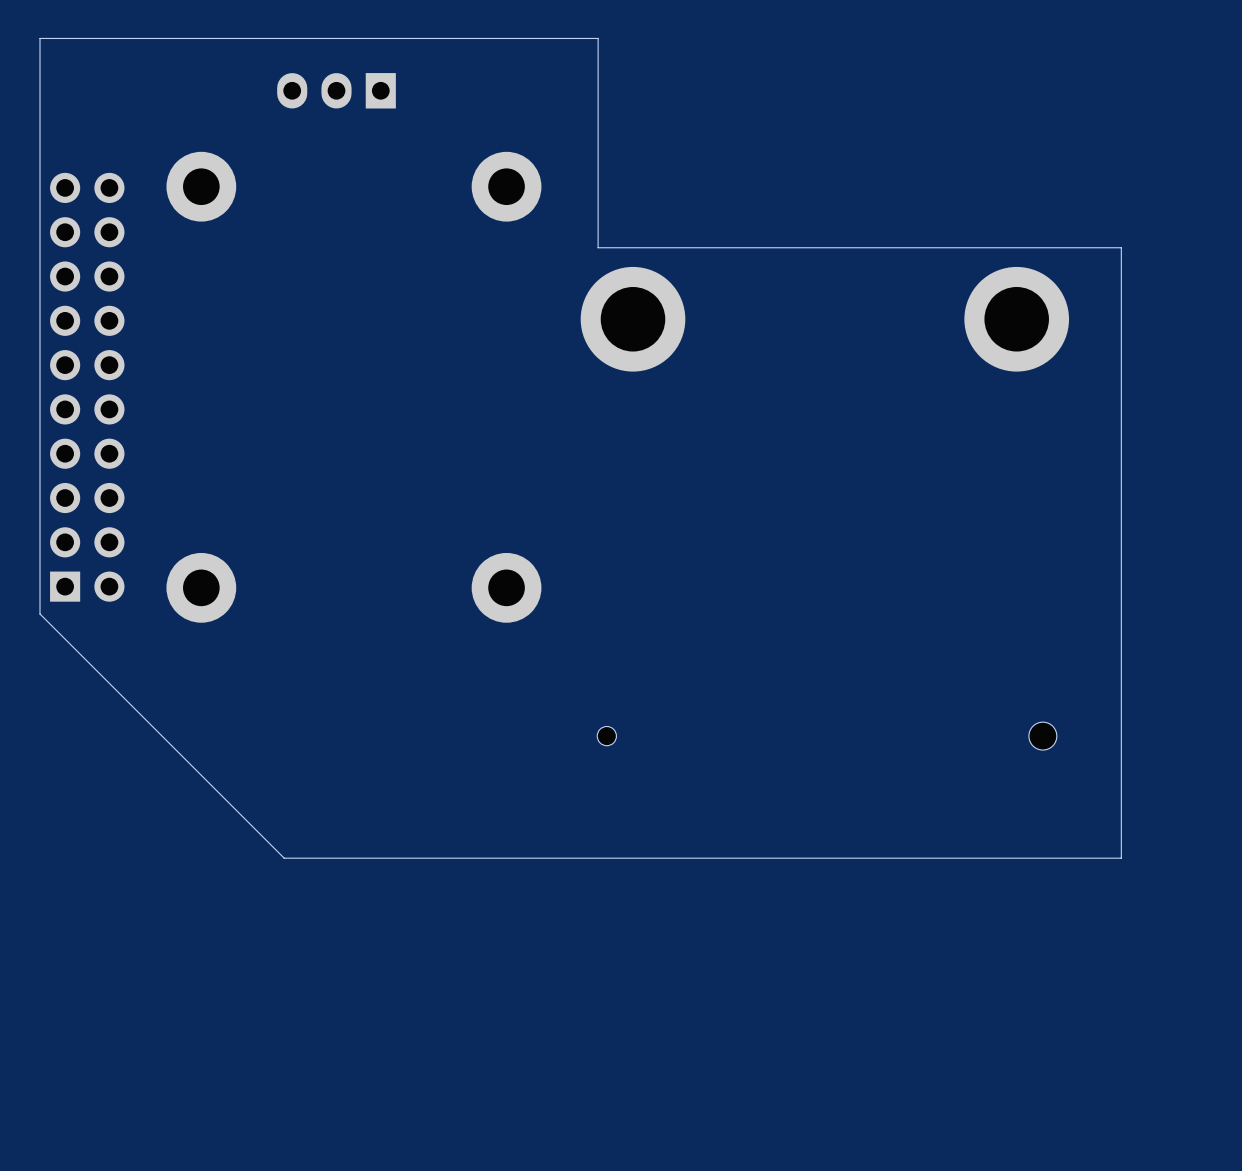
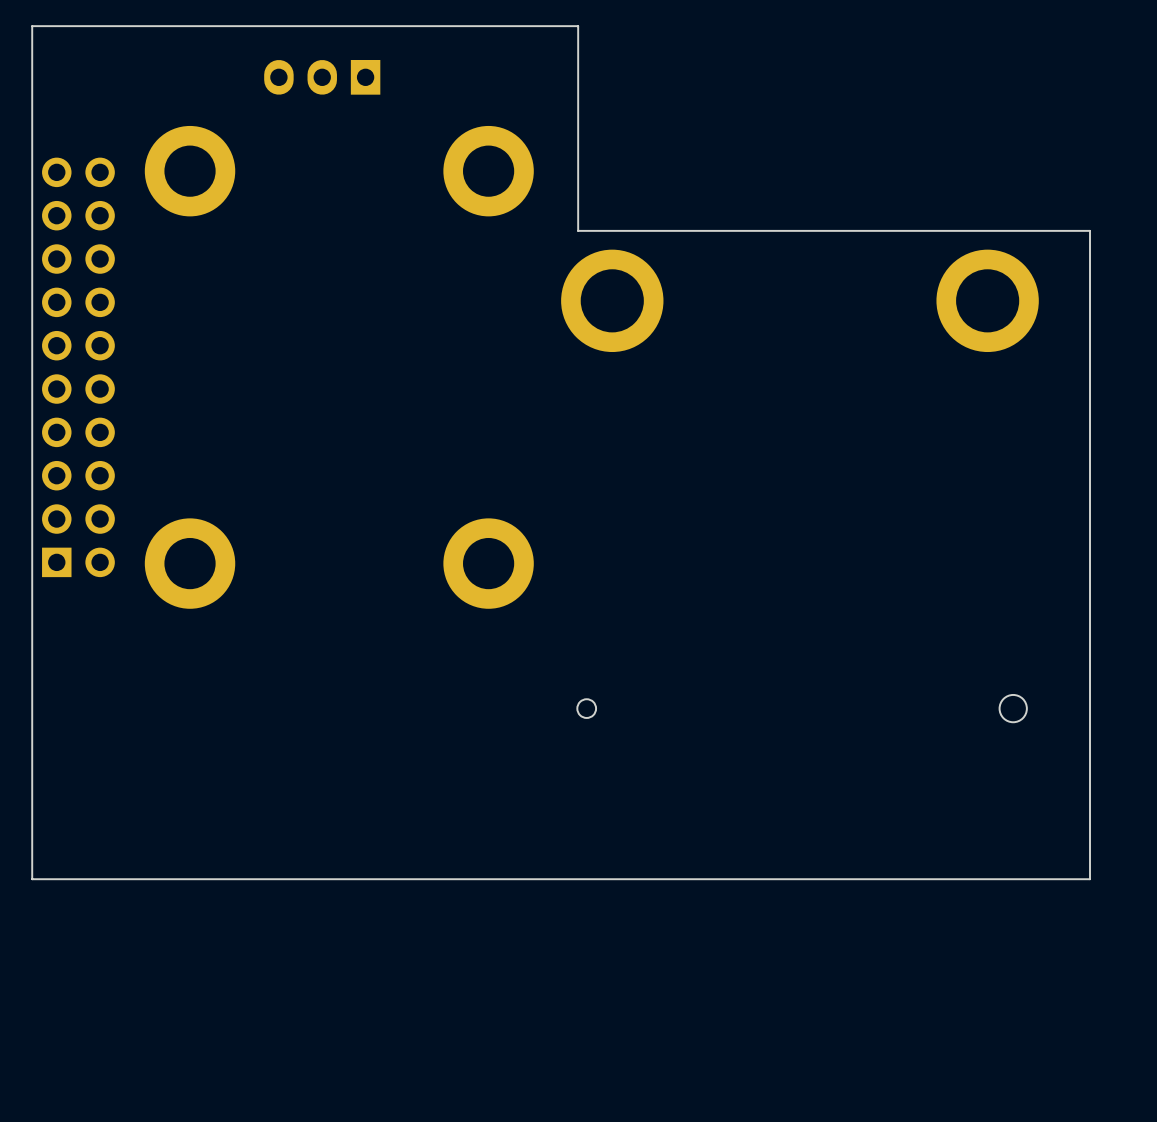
part footprint: [166, 151, 237, 222] -> [144, 125, 236, 217]
part footprint: [471, 151, 542, 222] -> [443, 125, 534, 217]
part footprint: [166, 552, 237, 623] -> [144, 518, 236, 609]
part footprint: [471, 552, 542, 623] -> [443, 518, 534, 609]
board edge: (40, 614) (284, 858) (1121, 858) -> (32, 589) (32, 879) (1090, 879) (1090, 828)

